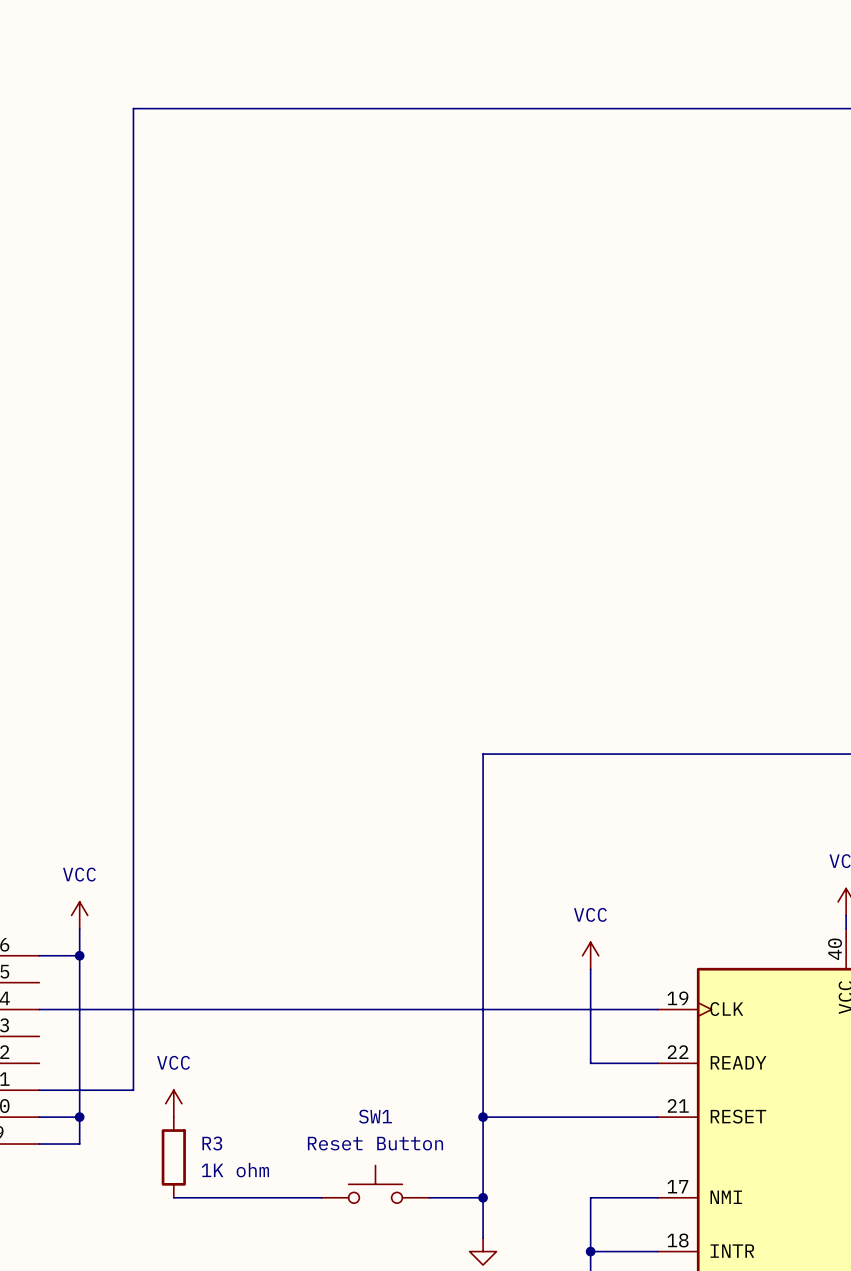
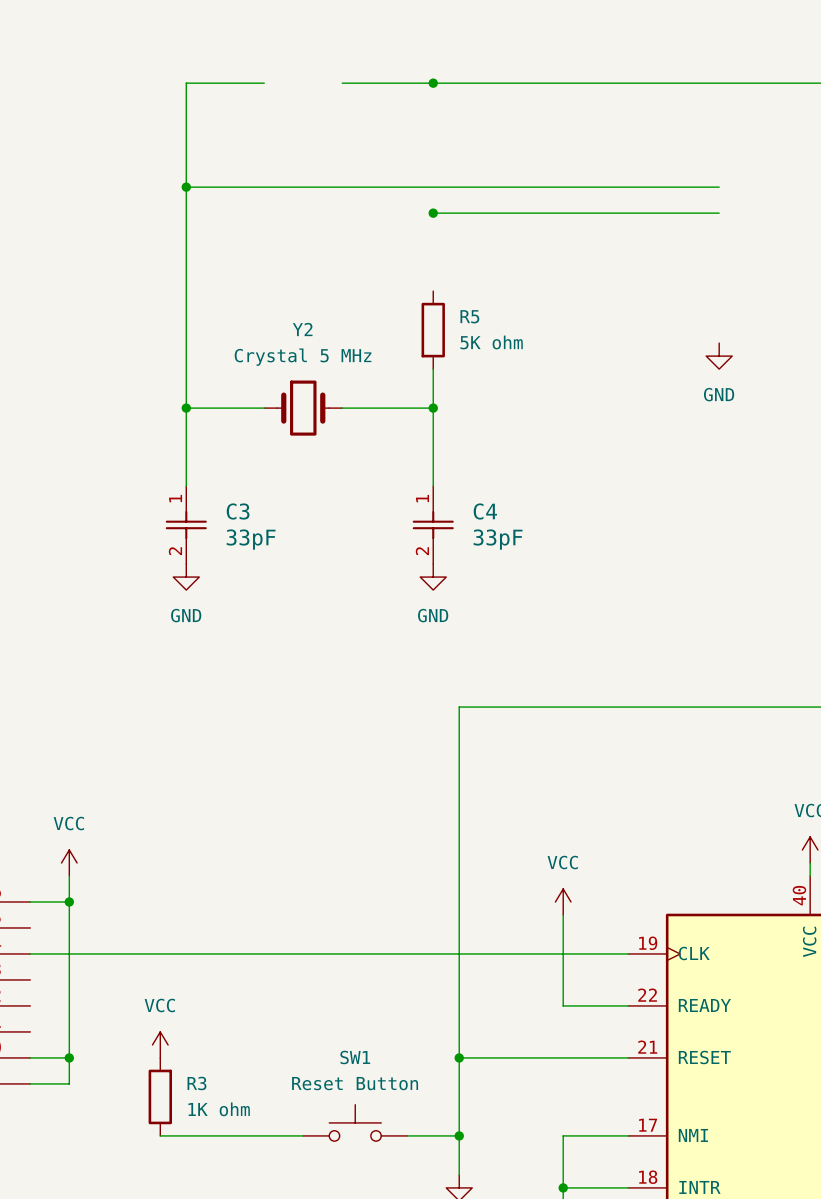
wire: (200, 108) (133, 108) (133, 1090) (39, 1090) -> (186, 83) (186, 486)
wire: (281, 108) (362, 108) -> none
junction: none -> (433, 83)
wire: none -> (186, 187) (719, 187)
junction: none -> (186, 187)
wire: none -> (433, 213) (719, 213)
junction: none -> (433, 213)
R5: none -> 5K ohm (433, 330)
power symbol: none -> GND (719, 356)
wire: none -> (433, 369) (433, 486)
wire: none -> (186, 408) (264, 408)
junction: none -> (186, 408)
Y2: none -> Crystal 5 MHz (303, 408)
wire: none -> (342, 408) (433, 408)
junction: none -> (433, 408)
C3: none -> 33pF (186, 525)
C4: none -> 33pF (433, 525)
power symbol: none -> GND (186, 577)
power symbol: none -> GND (433, 577)

